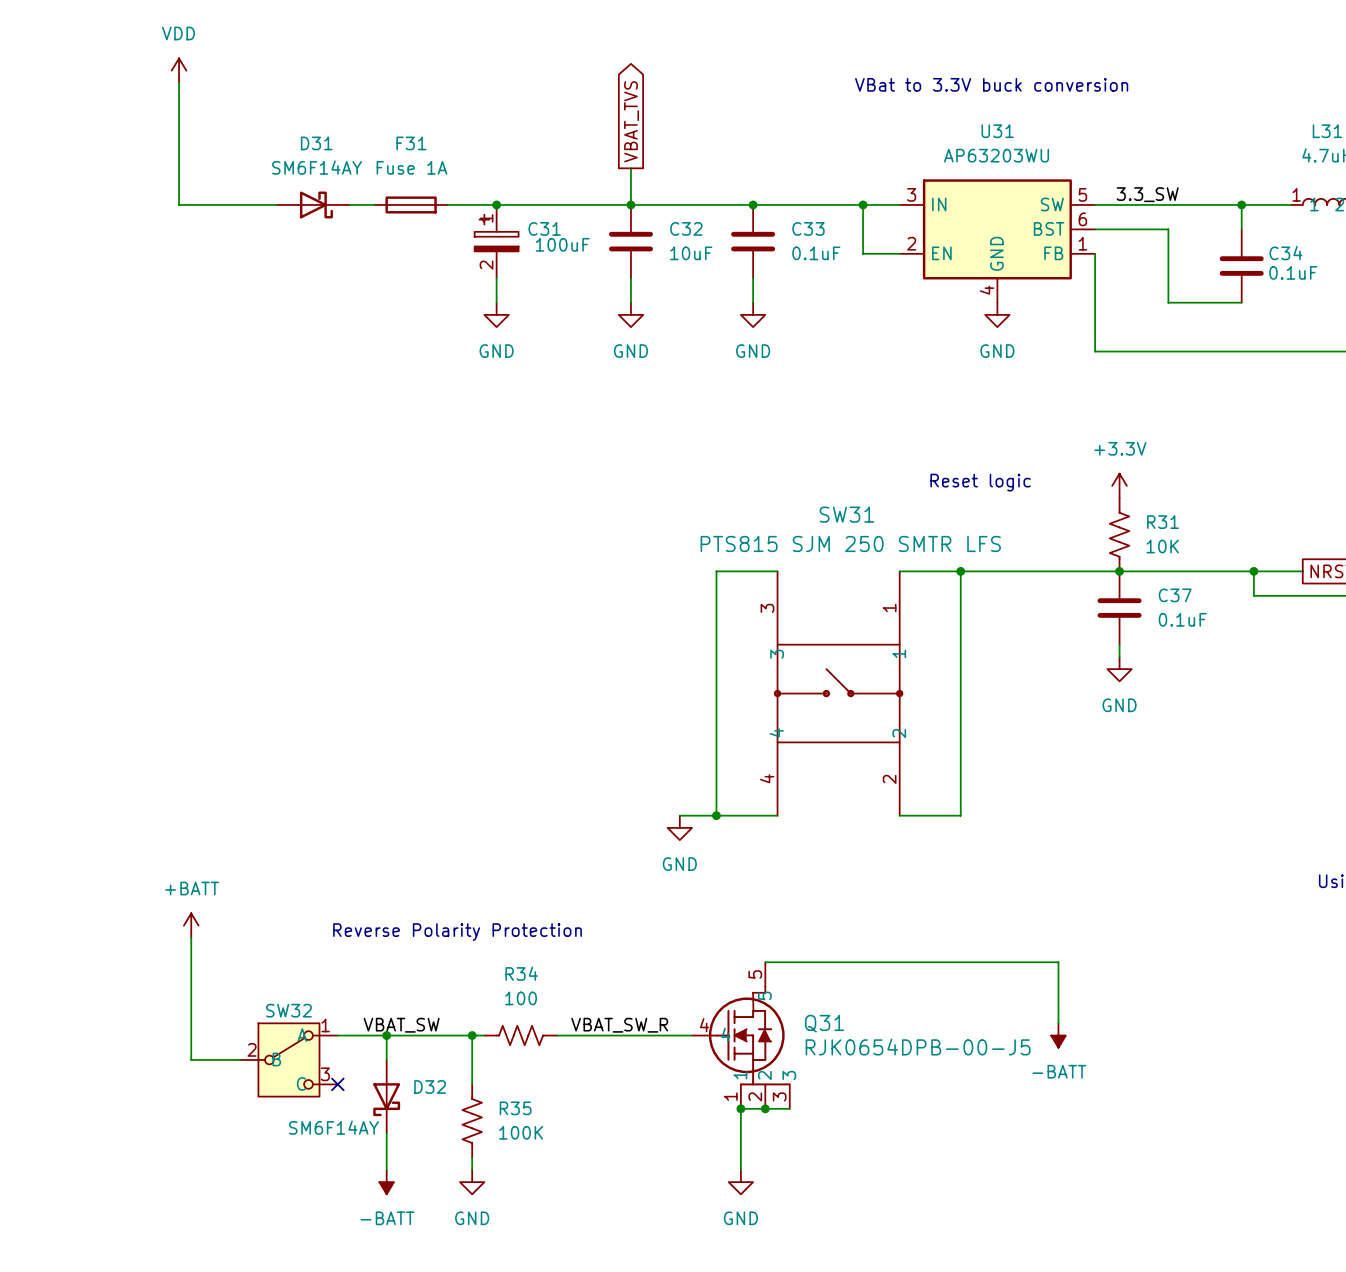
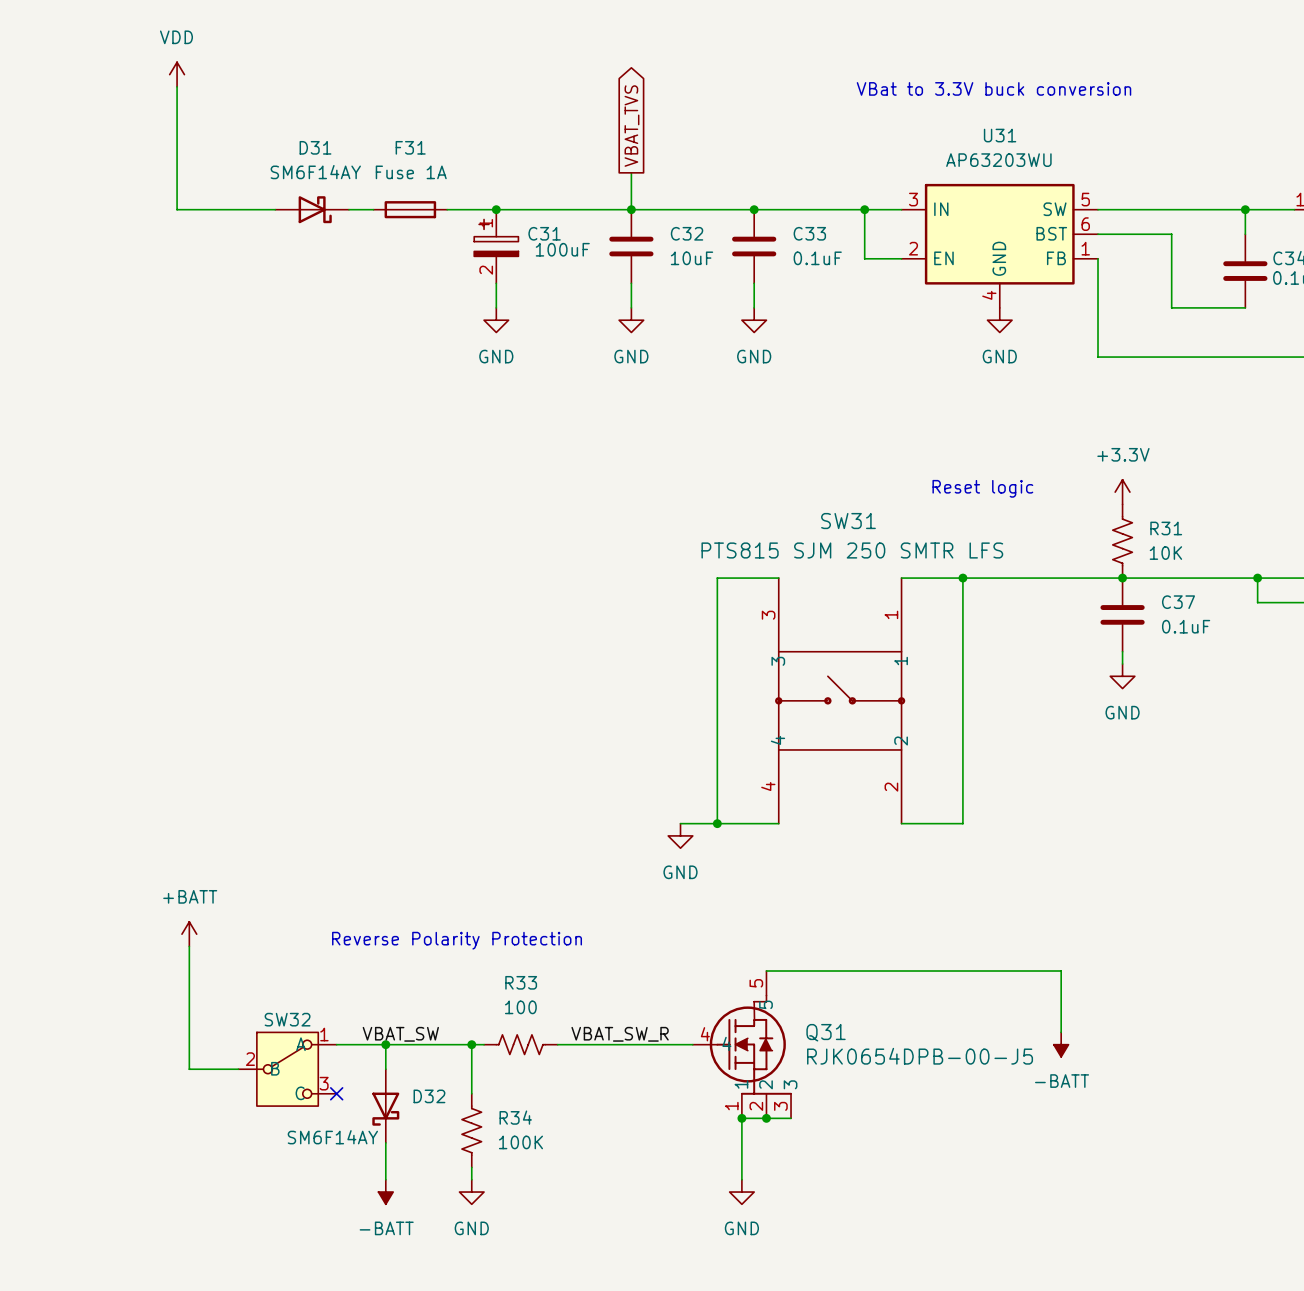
label: 3.3_SW (1147, 194) -> none
R34 name: R34 (521, 973) -> R33 (521, 982)
R35 name: R35 (515, 1108) -> R34 (515, 1117)

